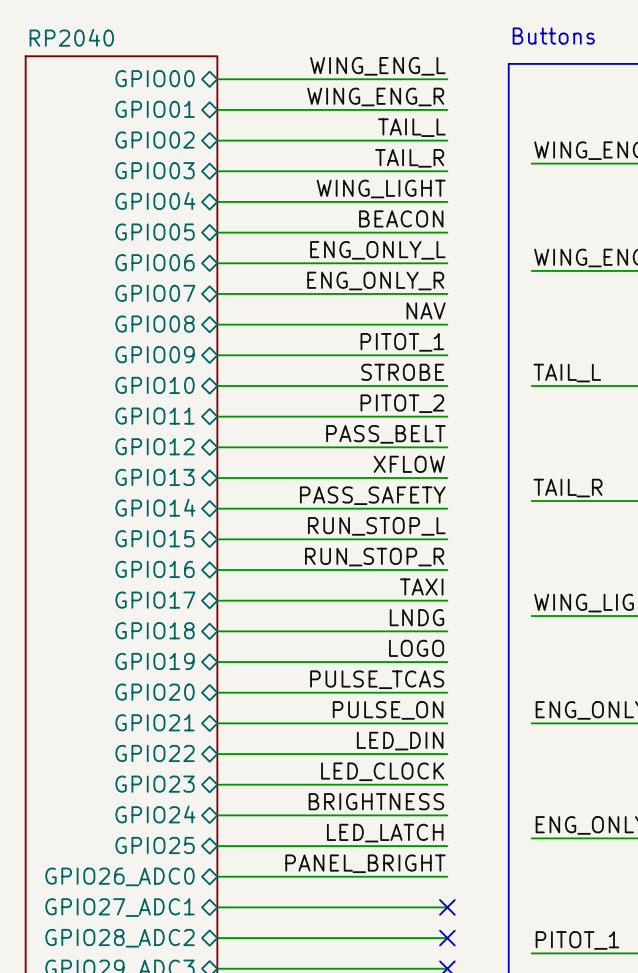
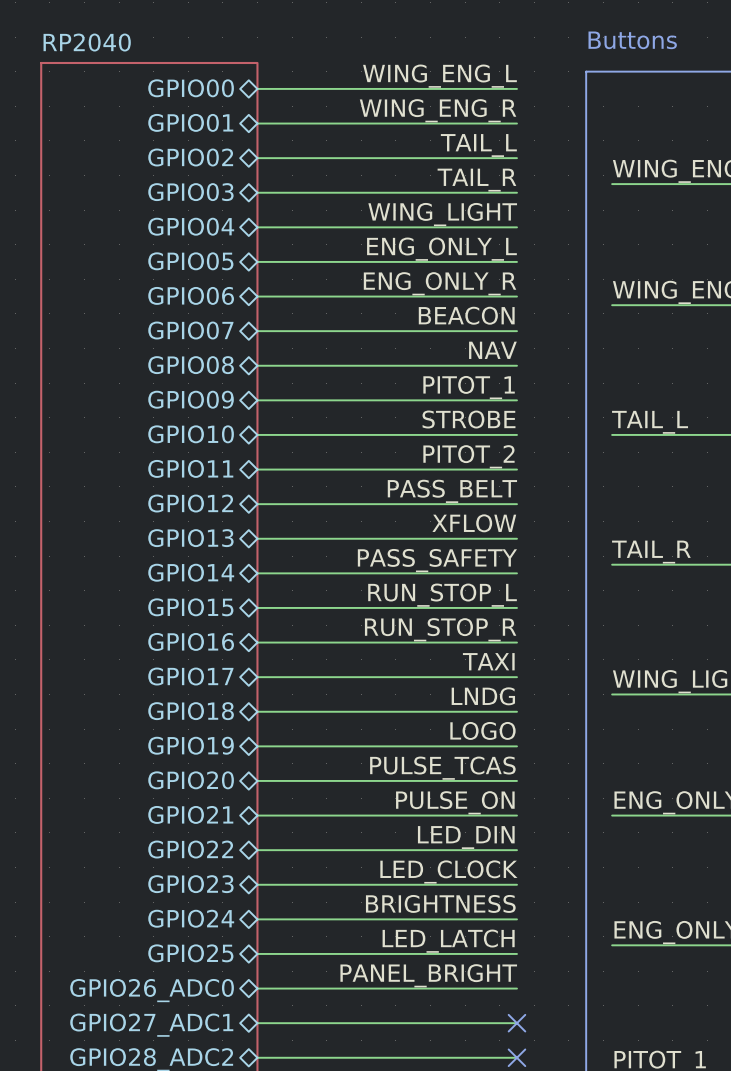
label: BEACON (401, 218) -> ENG_ONLY_L (441, 249)
label: ENG_ONLY_L (377, 250) -> ENG_ONLY_R (440, 283)
label: ENG_ONLY_R (375, 281) -> BEACON (466, 315)

